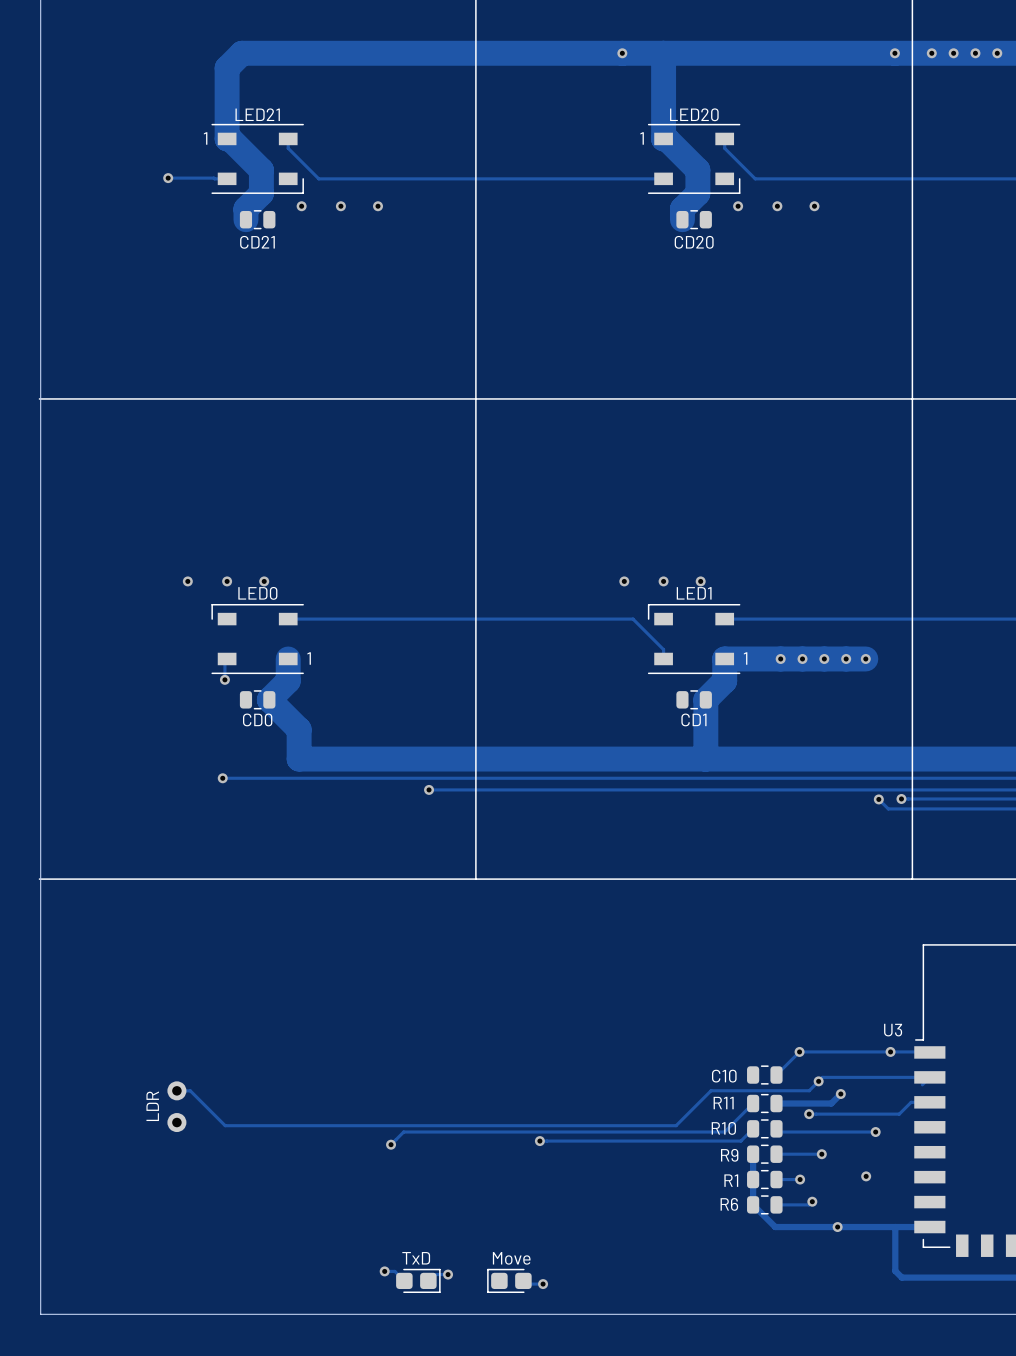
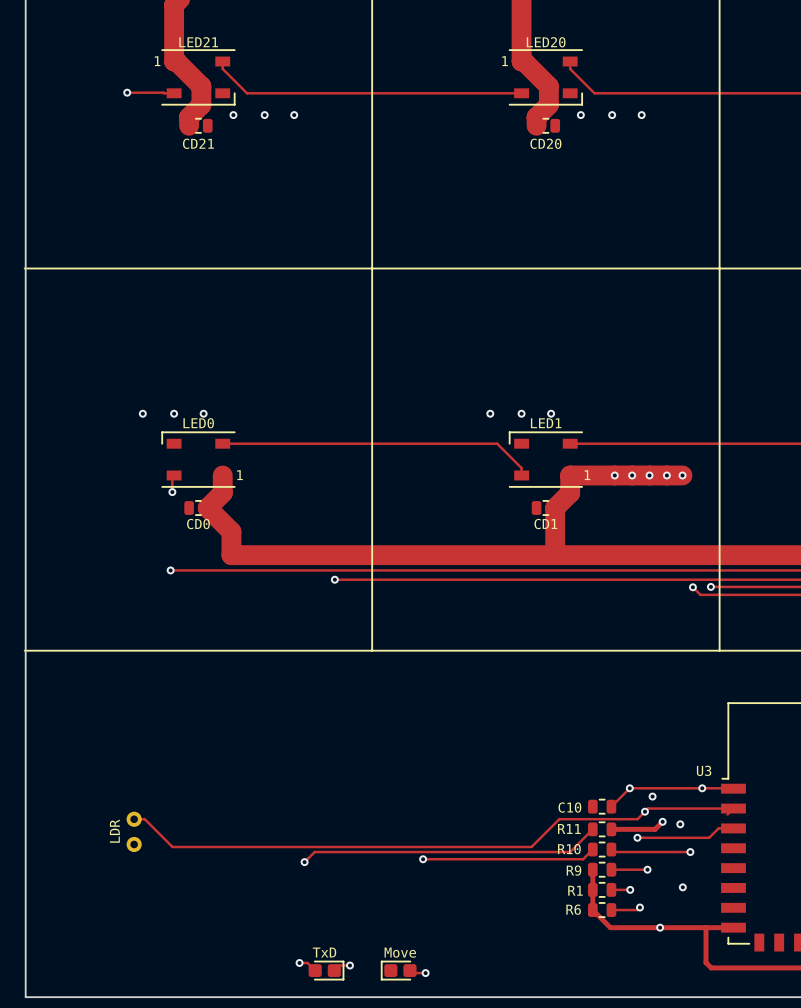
via: none -> (652, 796)
via: none -> (680, 824)

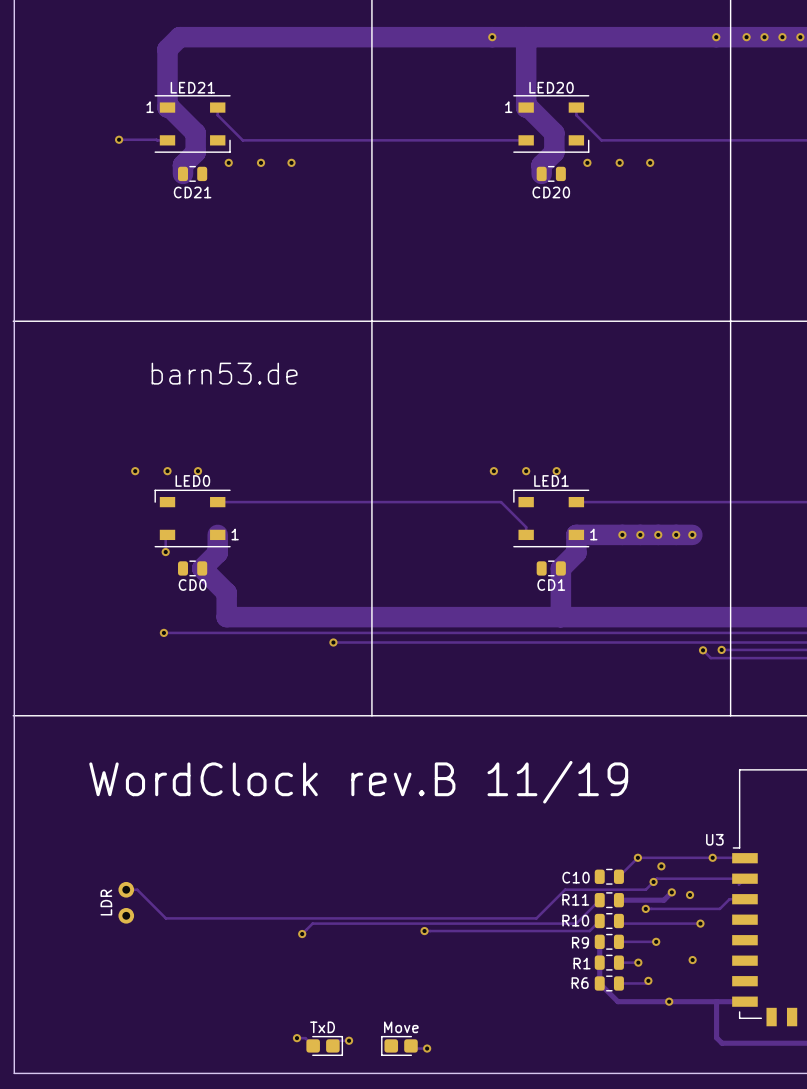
text: none -> barn53.de (224, 373)
text: none -> WordClock rev.B 11/19 (358, 782)

